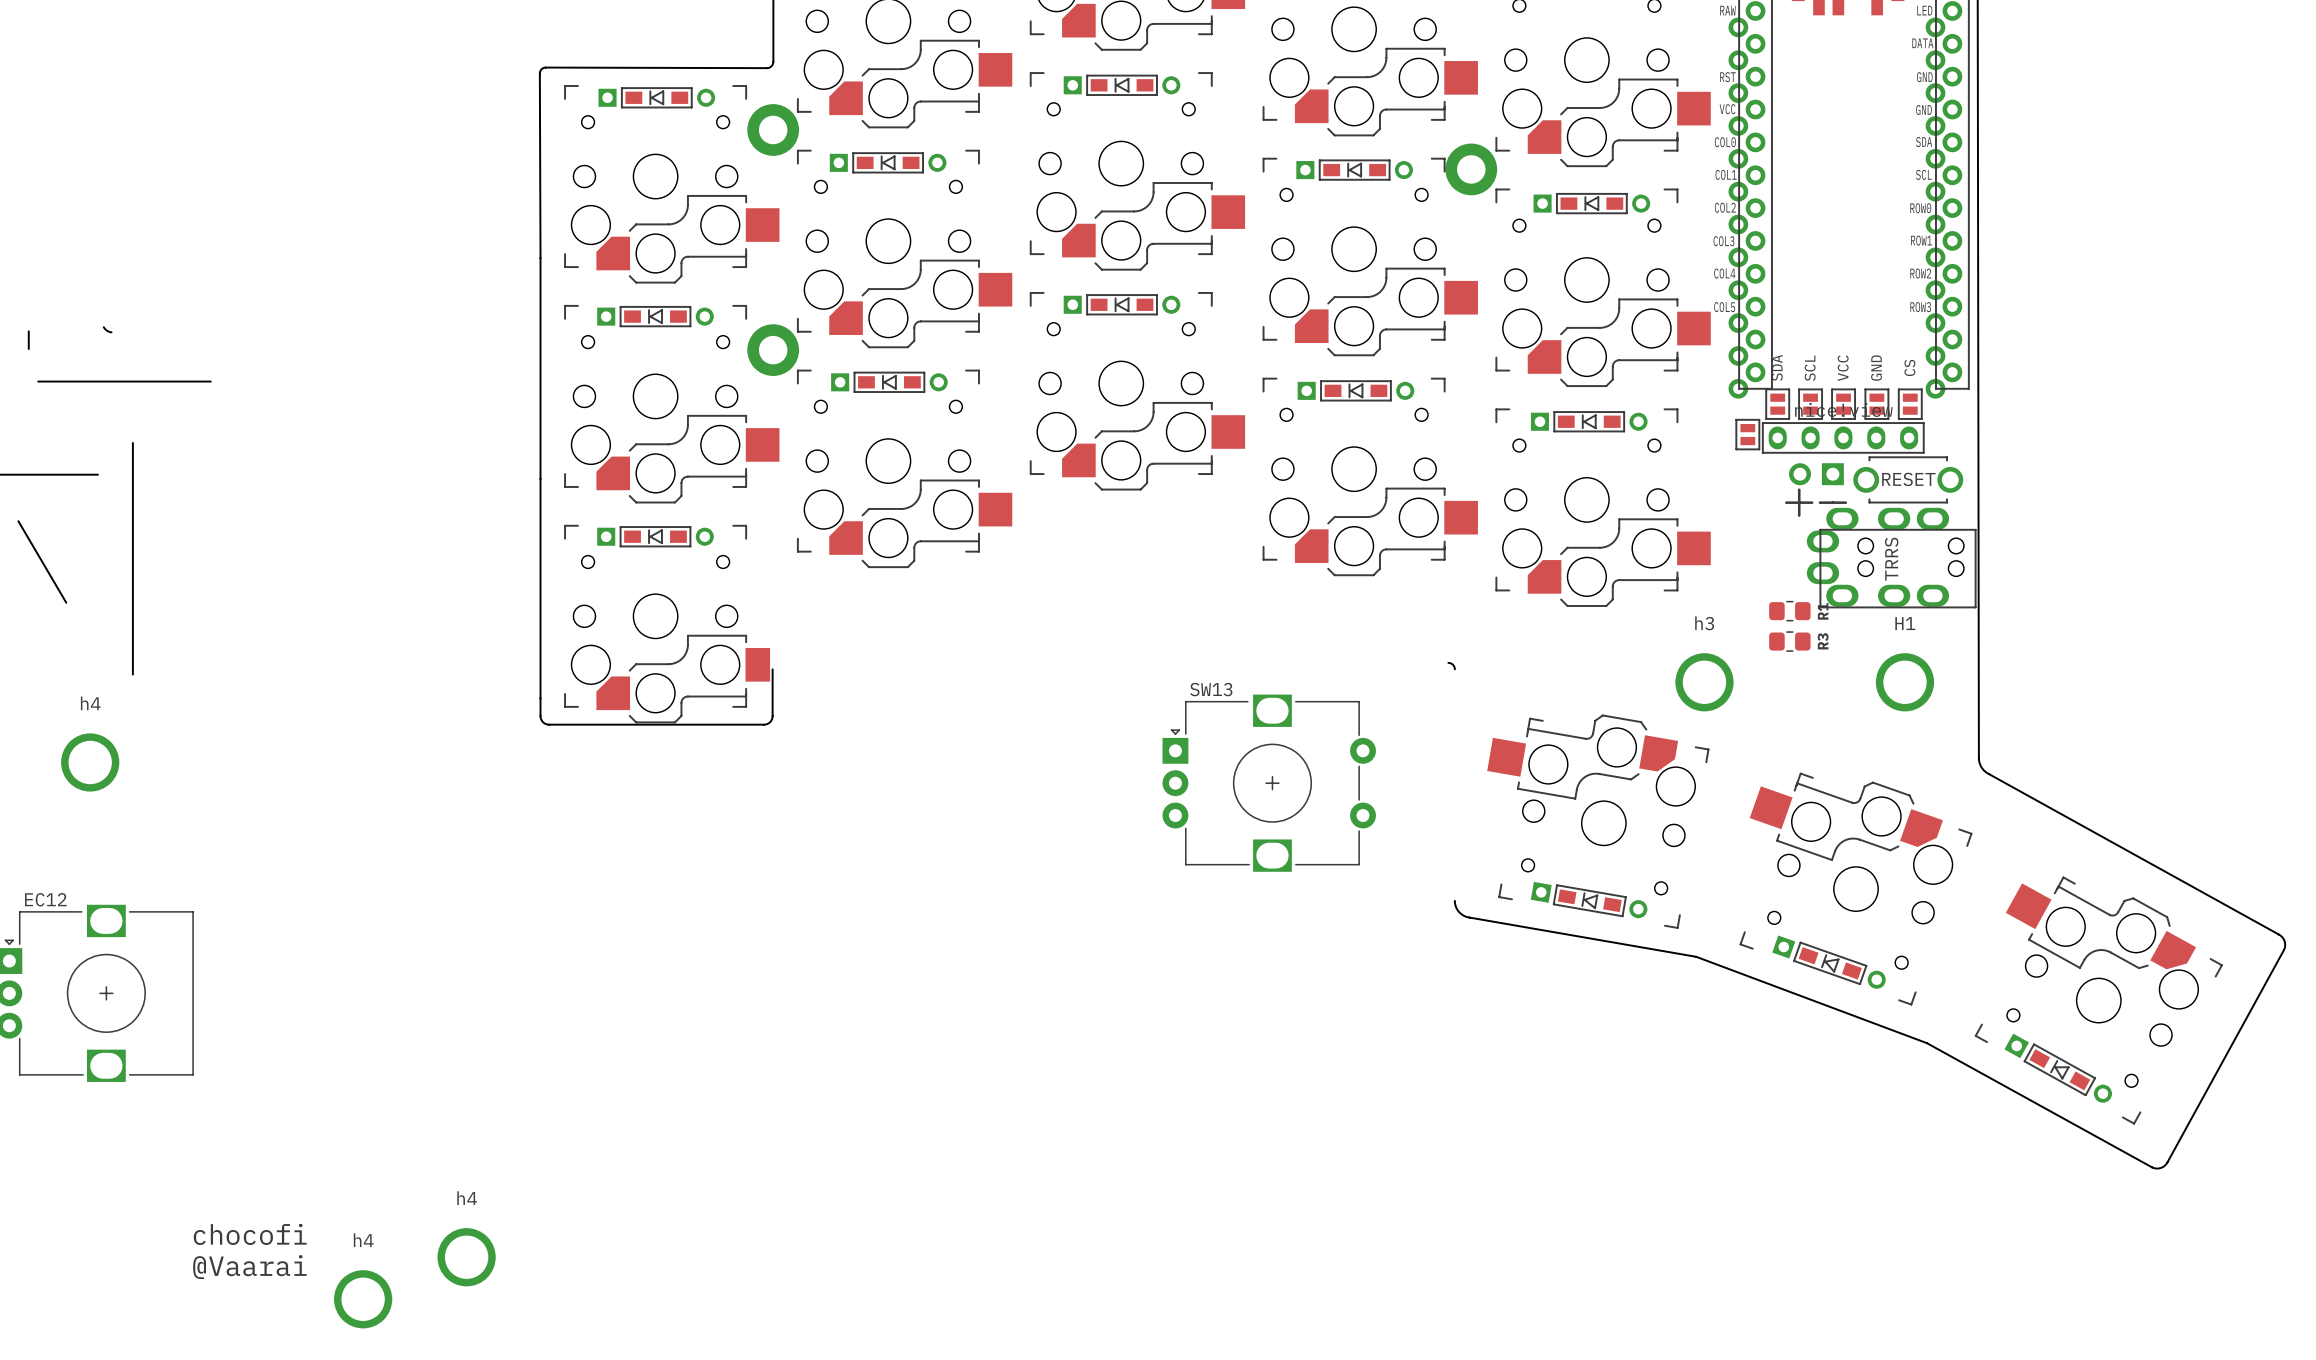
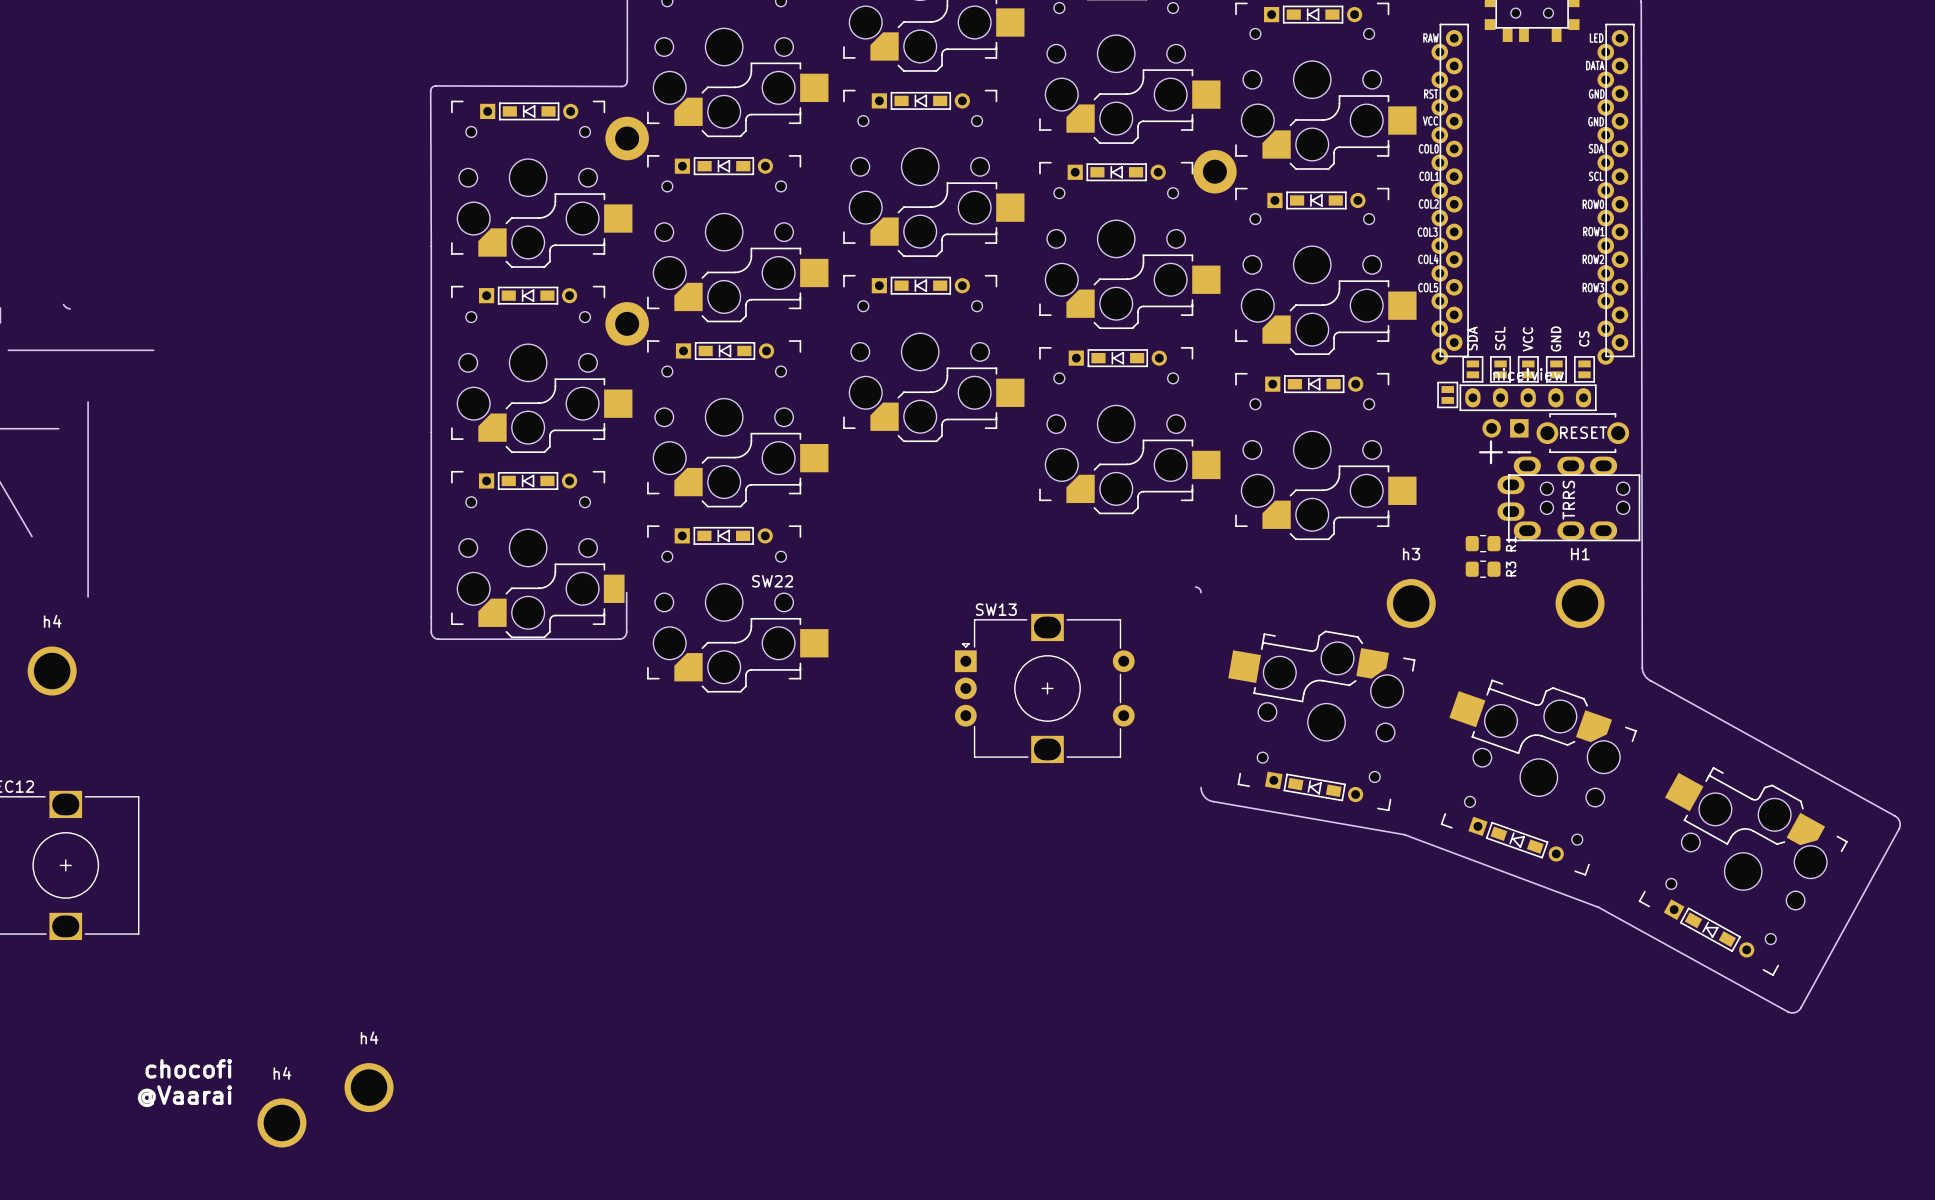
part: none -> (723, 535)
SW22: none -> (737, 608)

